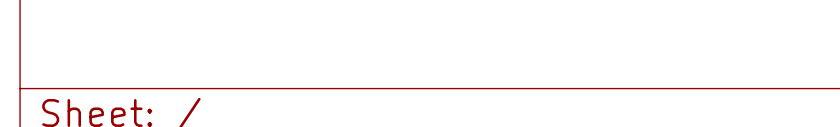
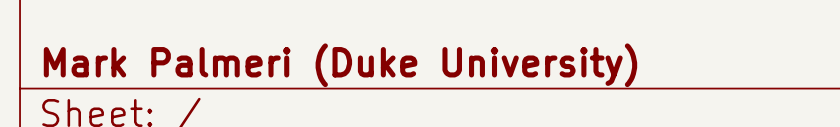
title block: none -> Mark Palmeri (Duke University) (340, 65)

